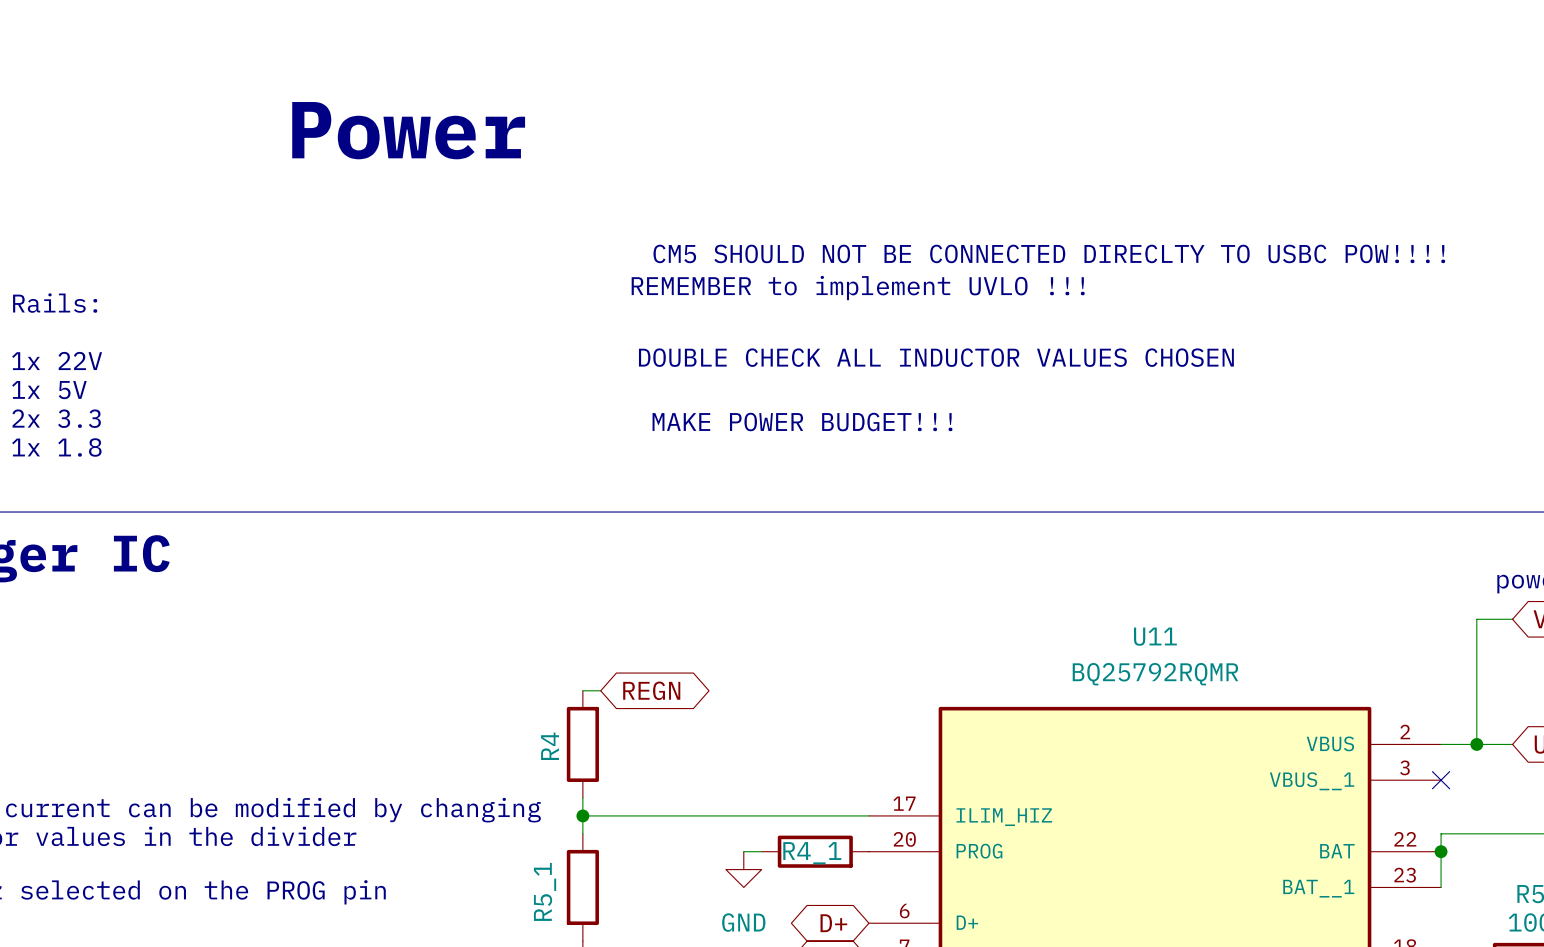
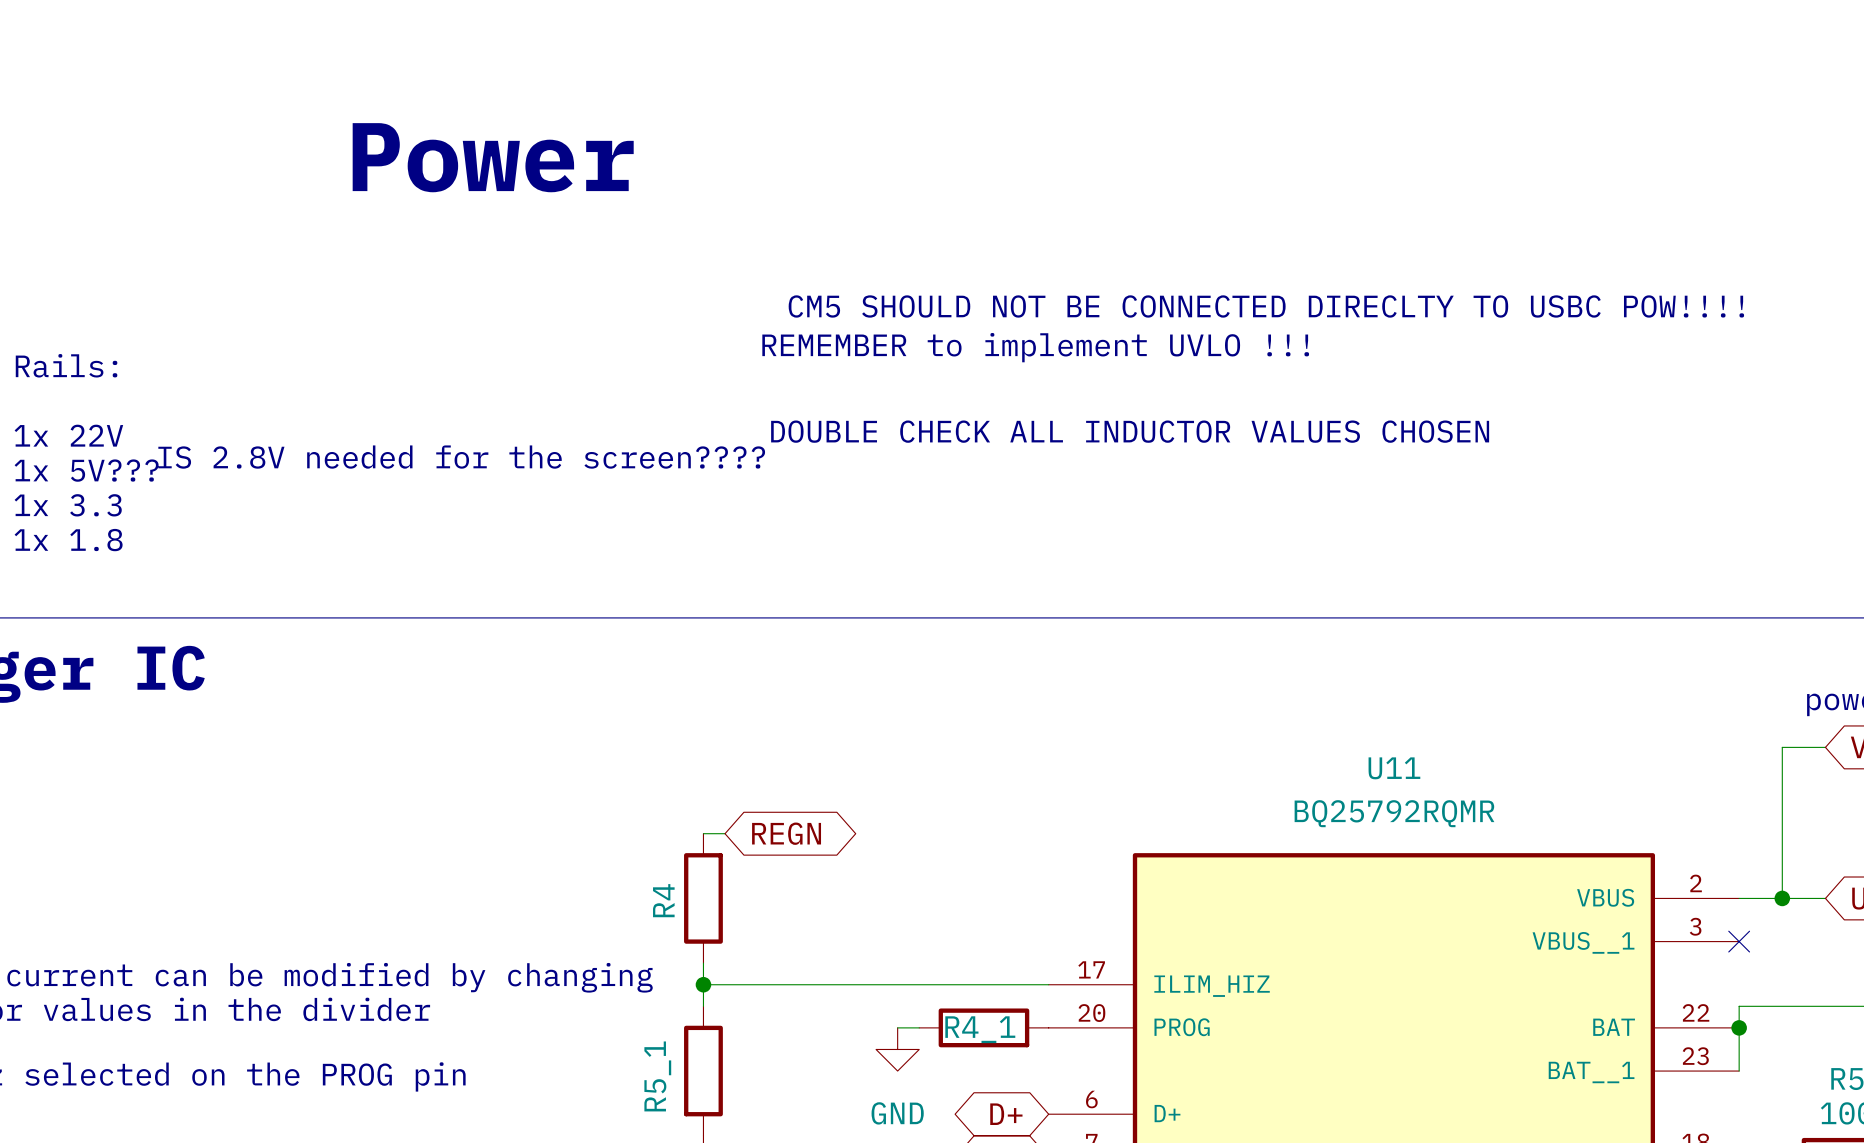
text: none -> IS 2.8V needed for the screen???? (461, 457)
text: 1x 5V (49, 390) -> 1x 5V??? (86, 470)
text: 2x 3.3 (56, 418) -> 1x 3.3 (68, 505)
text: MAKE POWER BUDGET!!! (802, 422) -> none

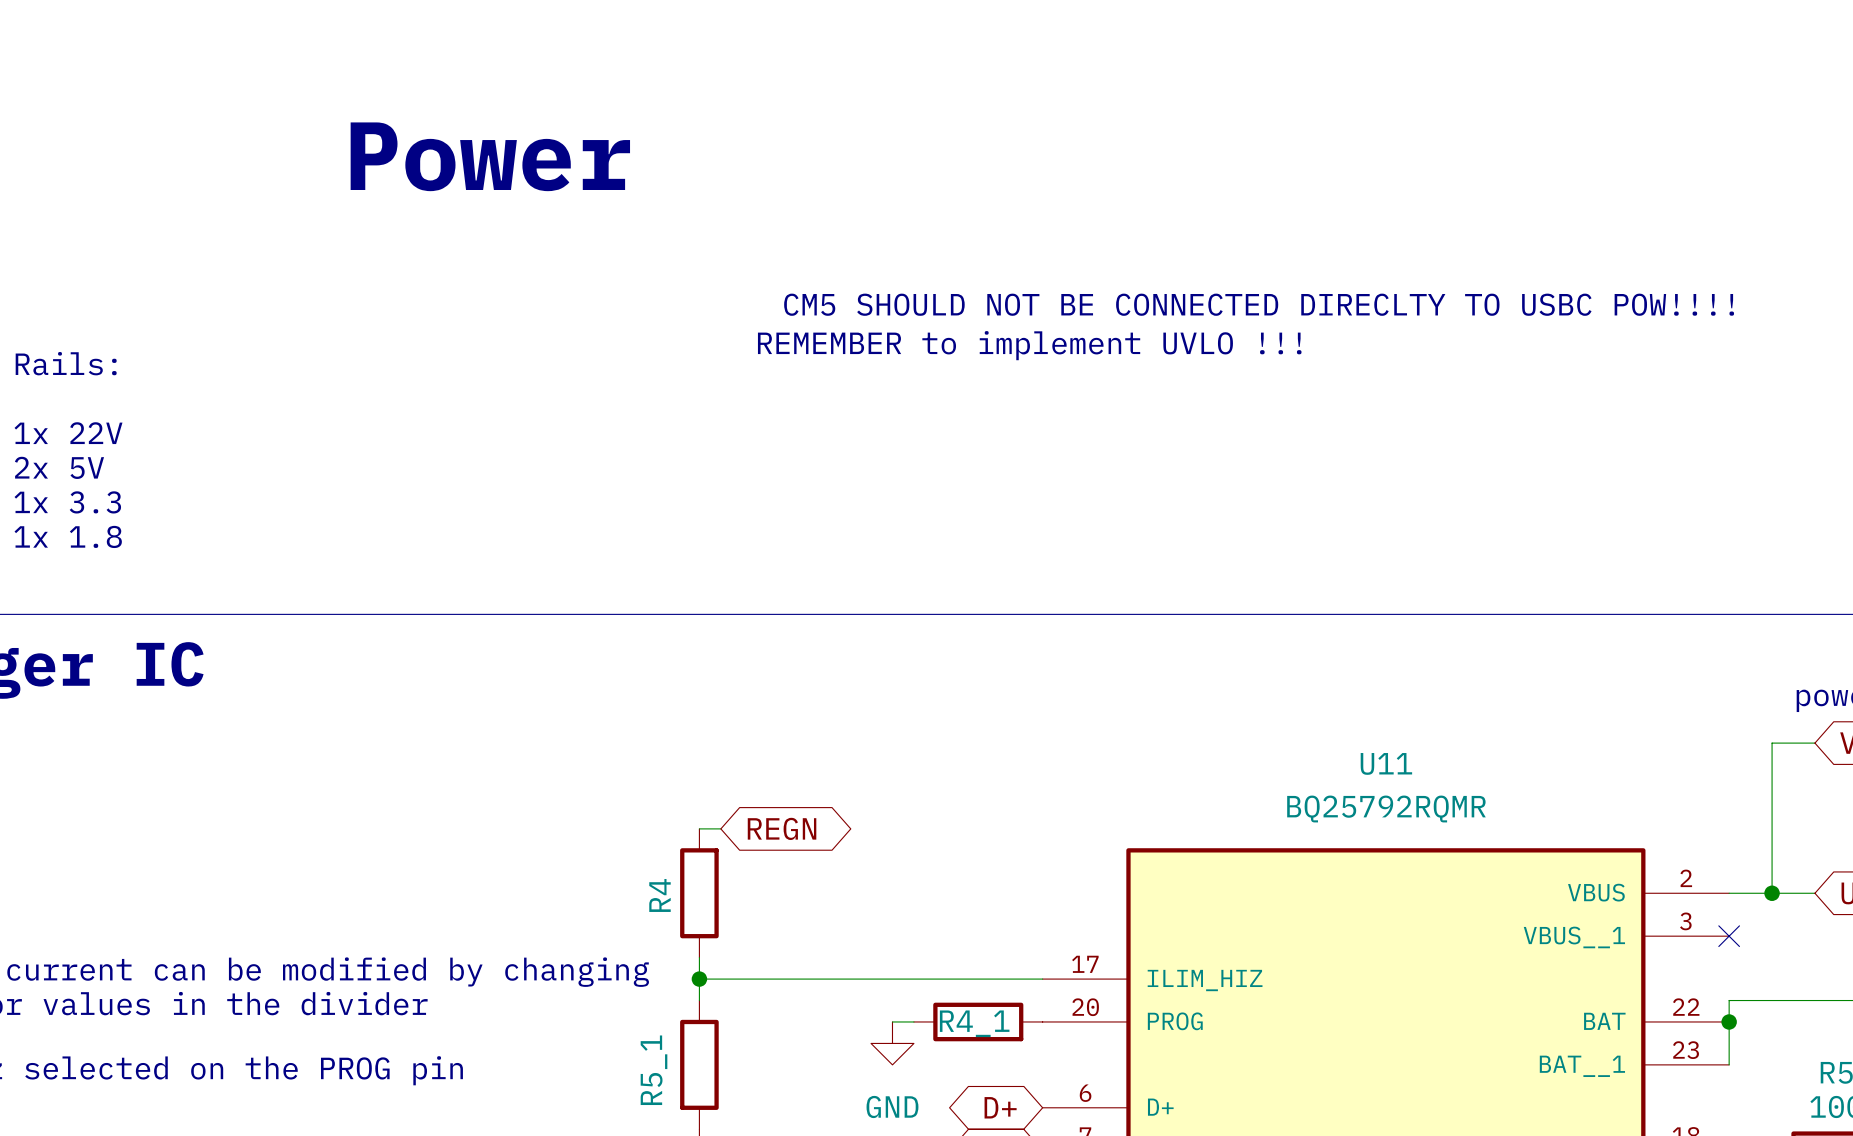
text: DOUBLE CHECK ALL INDUCTOR VALUES CHOSEN (1130, 431) -> none
text: IS 2.8V needed for the screen???? (461, 457) -> none
text: 1x 5V??? (86, 470) -> 2x 5V (59, 467)

